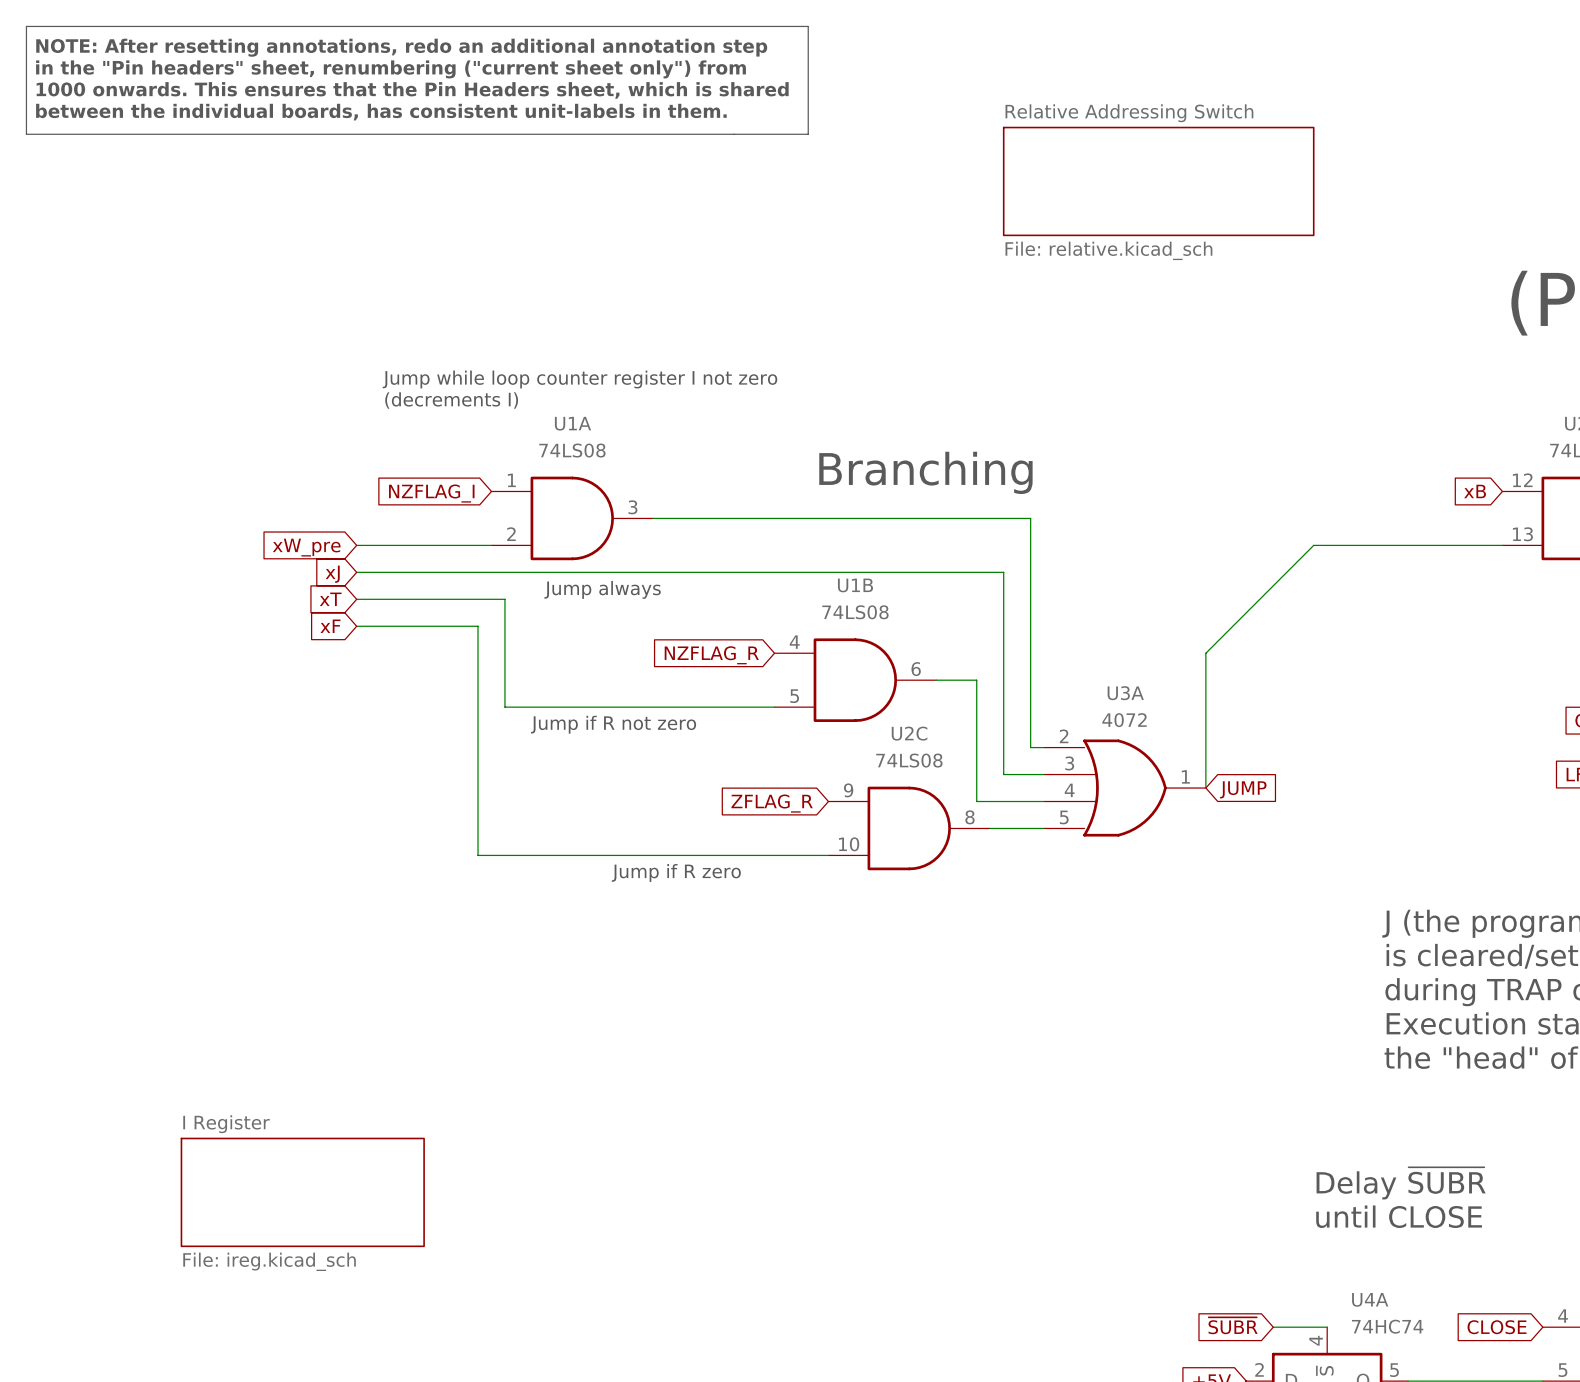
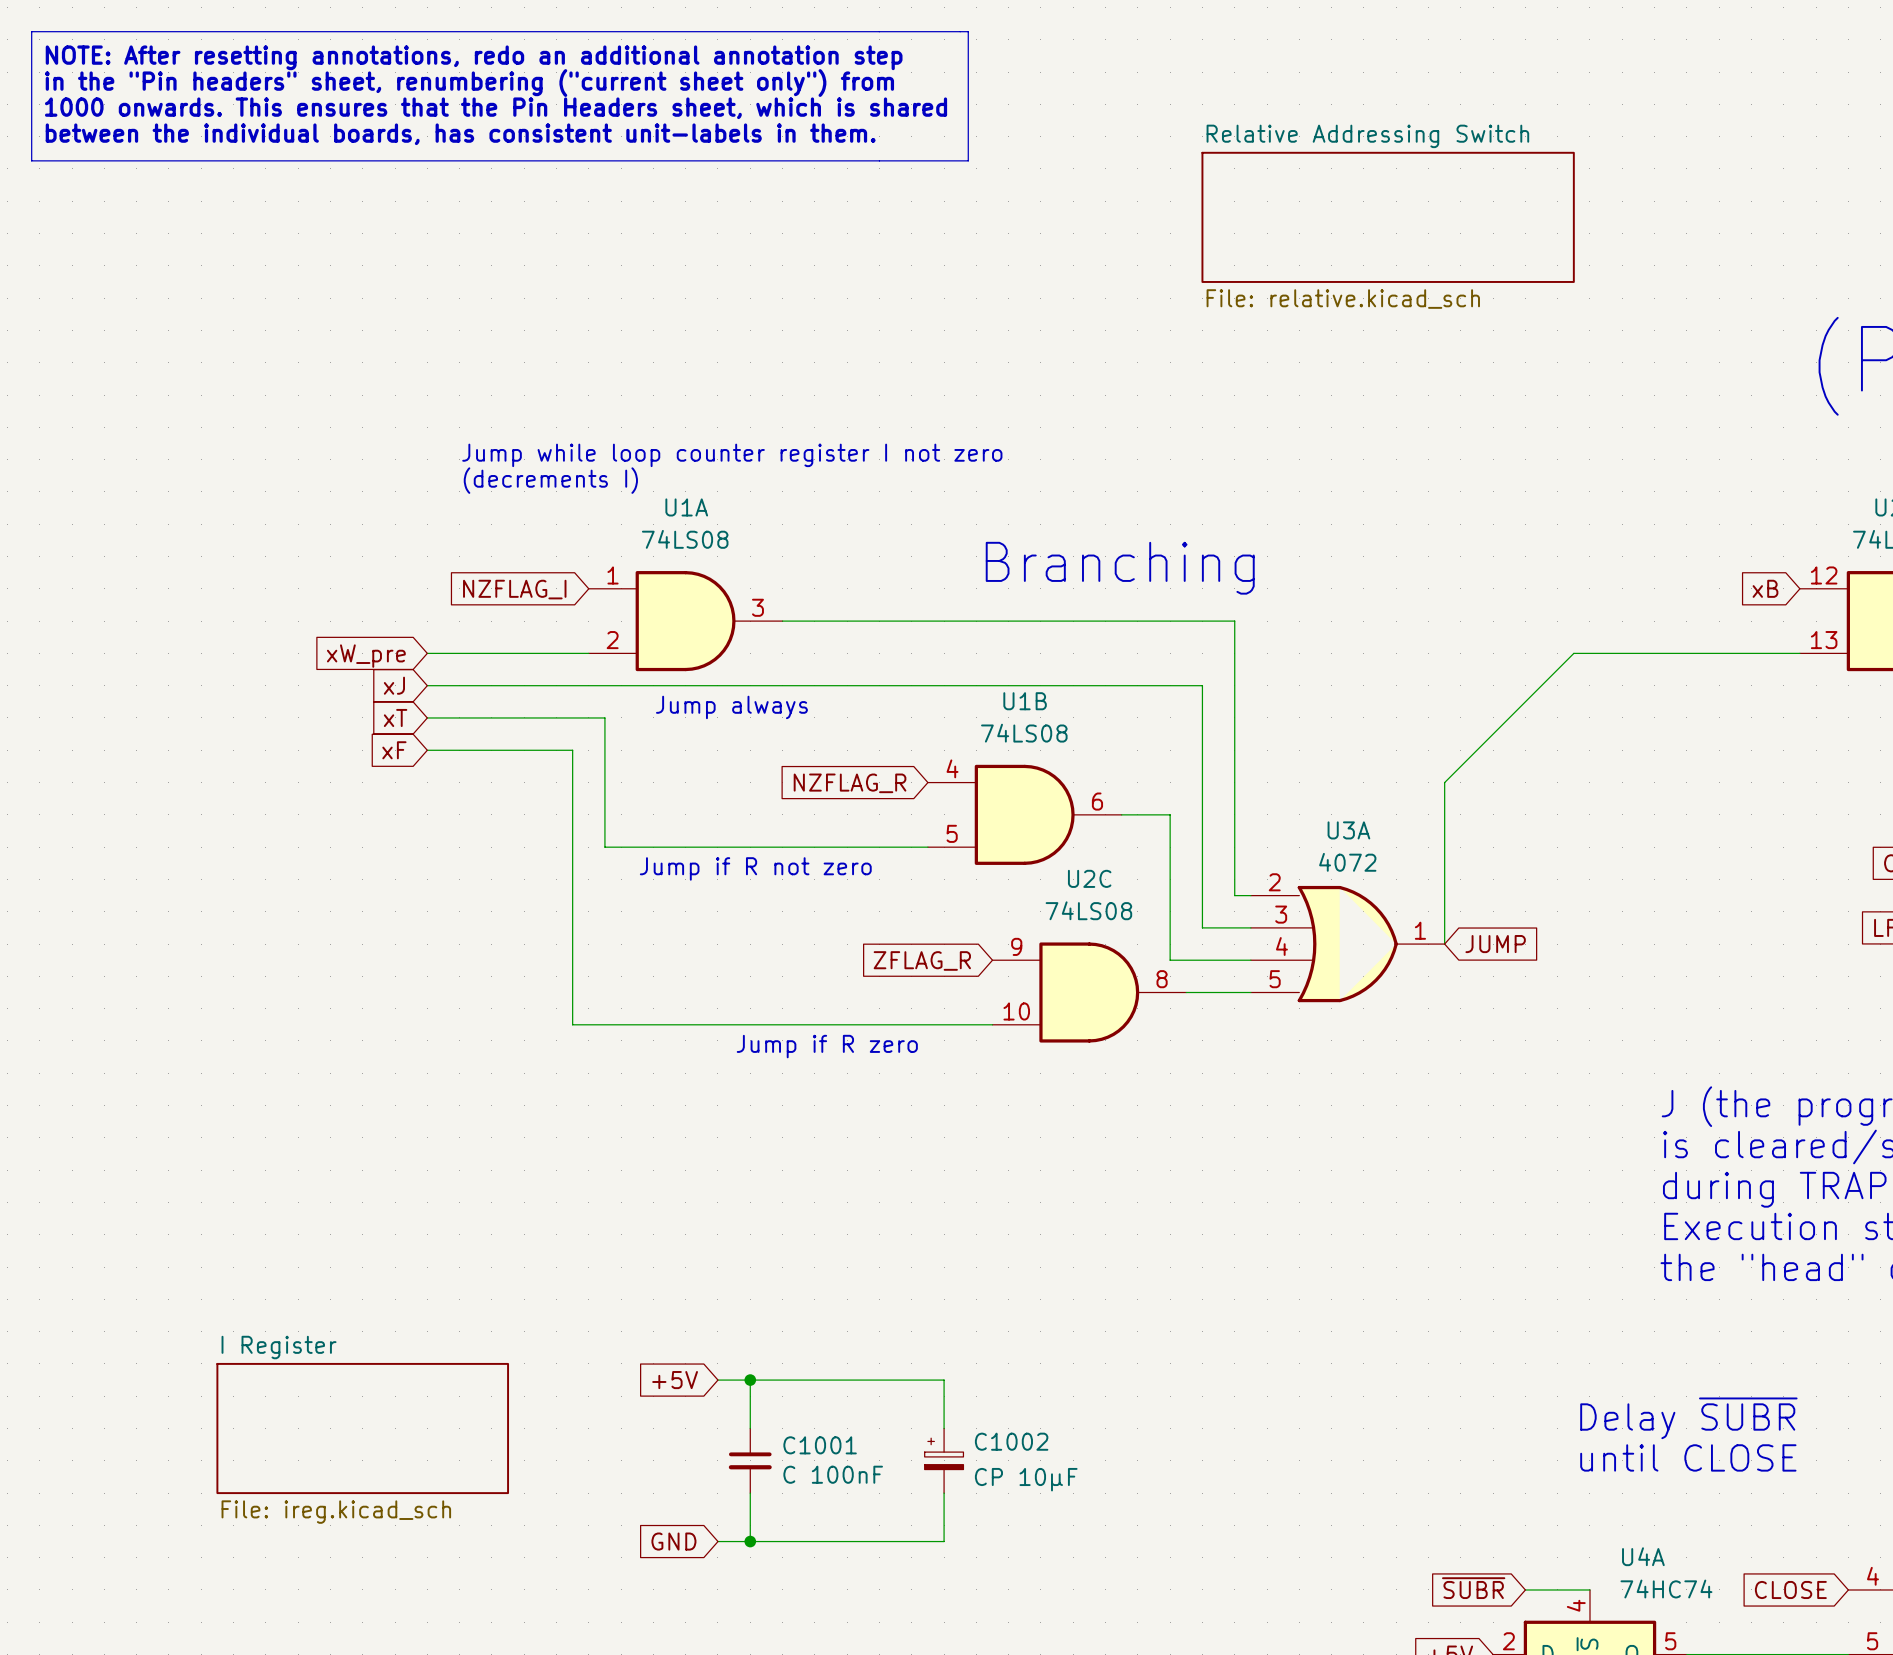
wire: none -> (717, 1380) (944, 1380) (944, 1428)
wire: none -> (750, 1380) (750, 1428)
junction: none -> (750, 1380)
global label: none -> +5V (675, 1380)
C1001: none -> C 100nF (750, 1460)
C1002: none -> CP 10μF (944, 1460)
wire: none -> (750, 1493) (750, 1541)
wire: none -> (944, 1493) (944, 1541) (717, 1541)
global label: none -> GND (673, 1541)
junction: none -> (750, 1541)

